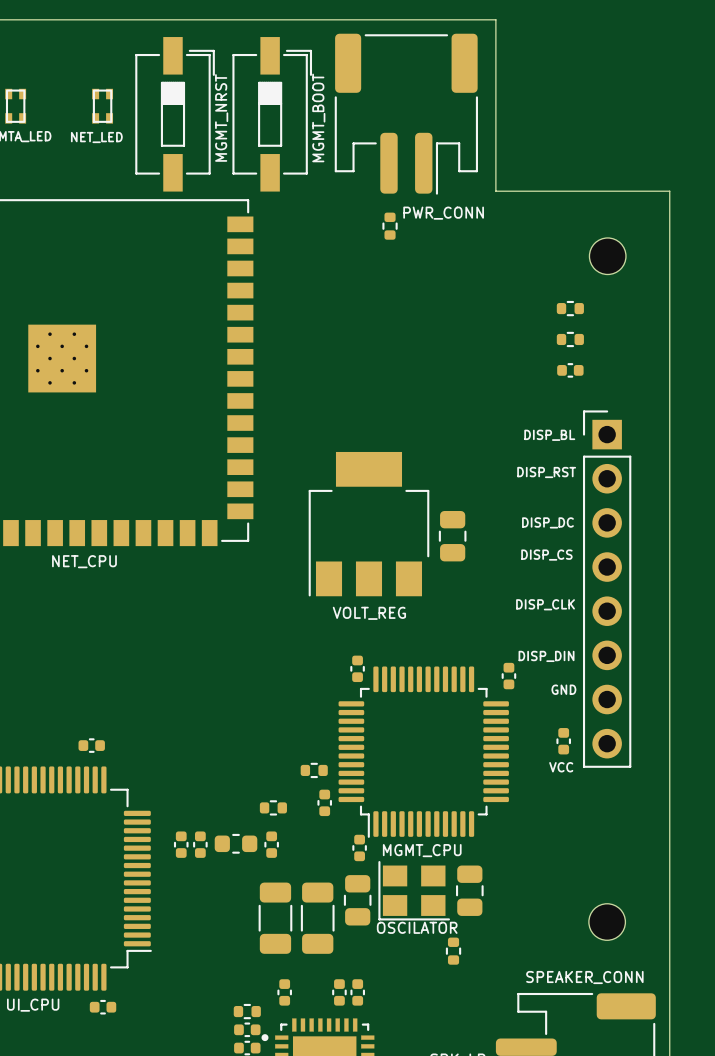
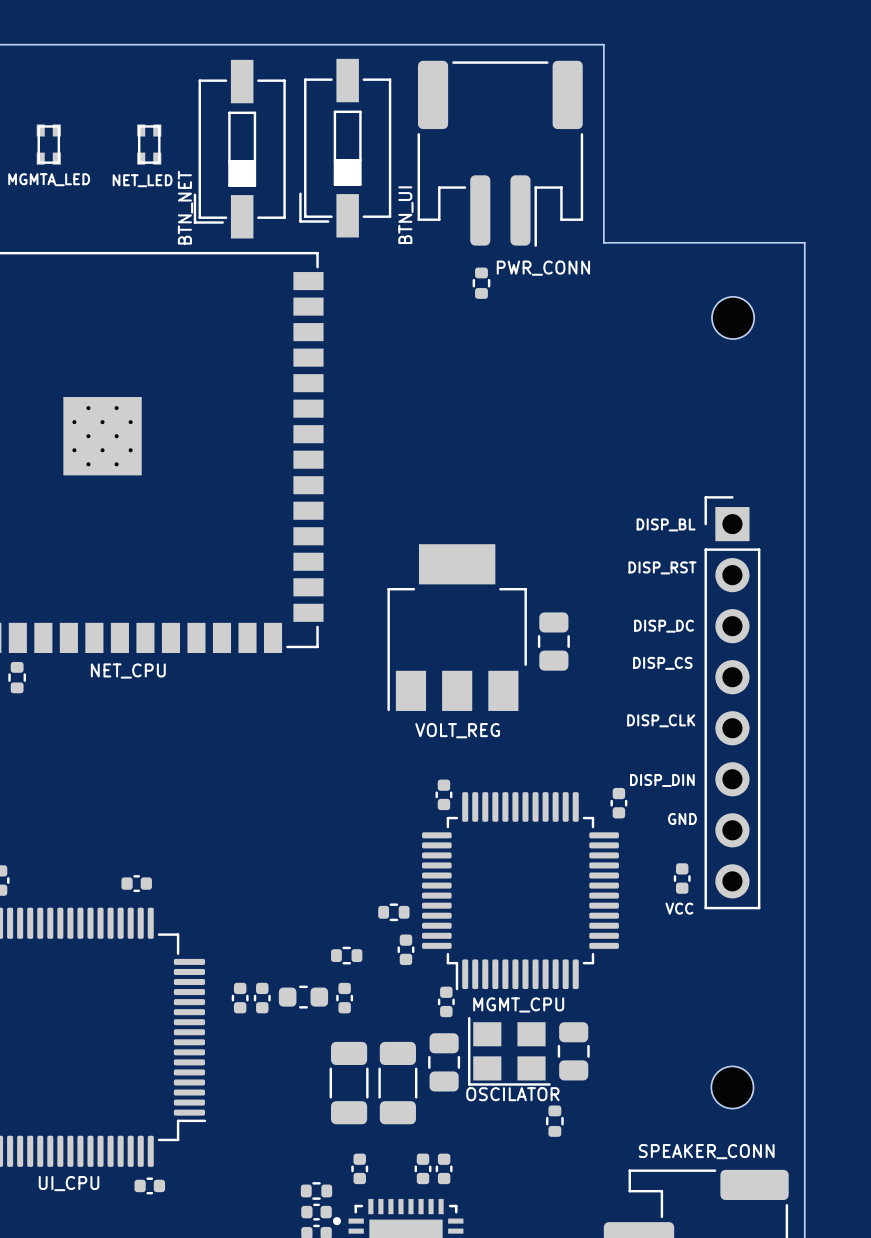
part rotation: 0° (175, 114) -> 180° (239, 149)
part rotation: 0° (272, 114) -> 180° (345, 148)
text: MGMT_NRST (221, 117) -> none
text: MGMT_BOOT (318, 117) -> none
text: none -> BTN_NET (185, 207)
text: none -> BTN_UI (405, 215)
part: (570, 308) -> none
part: (570, 339) -> none
part: (570, 370) -> none

